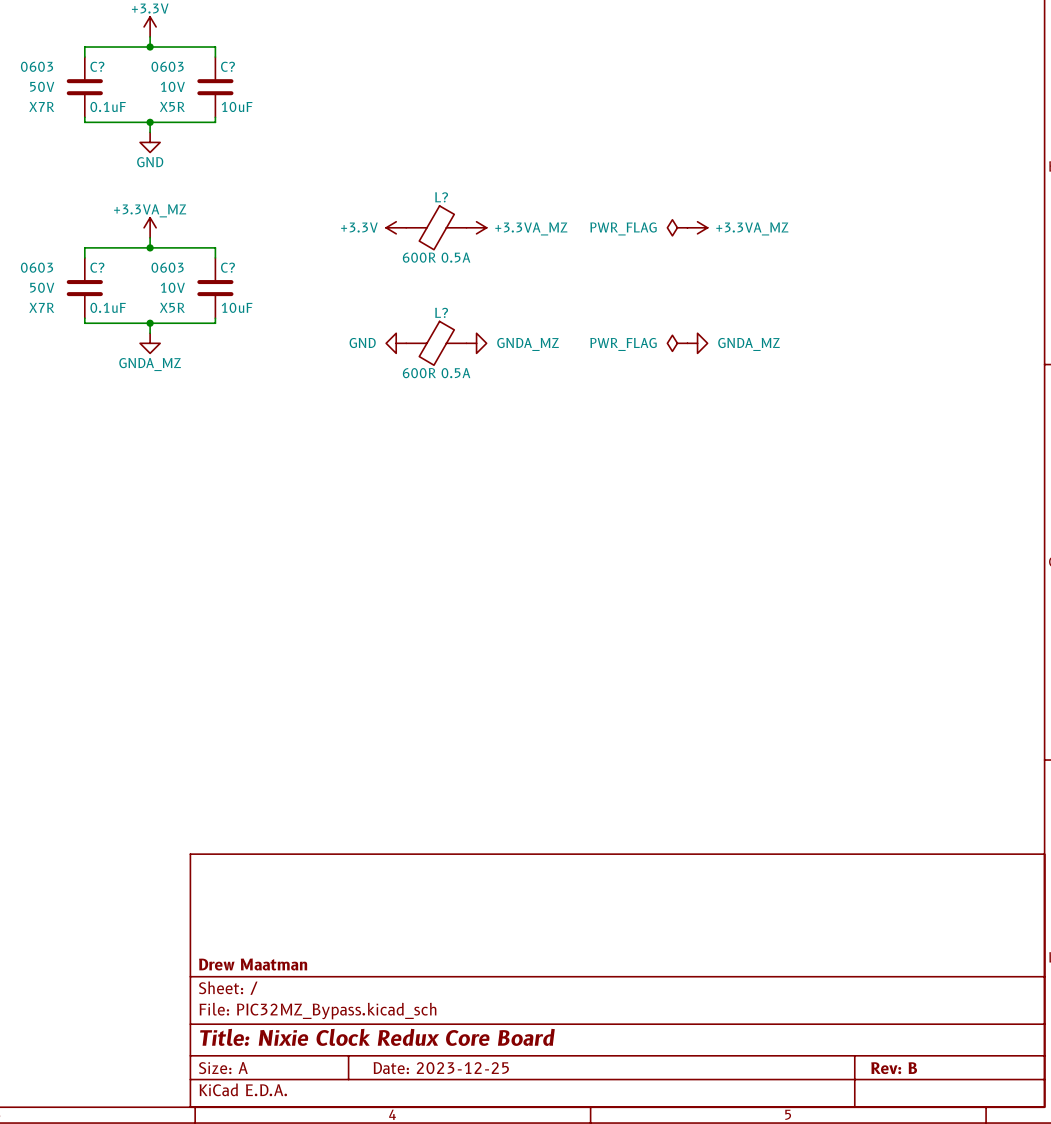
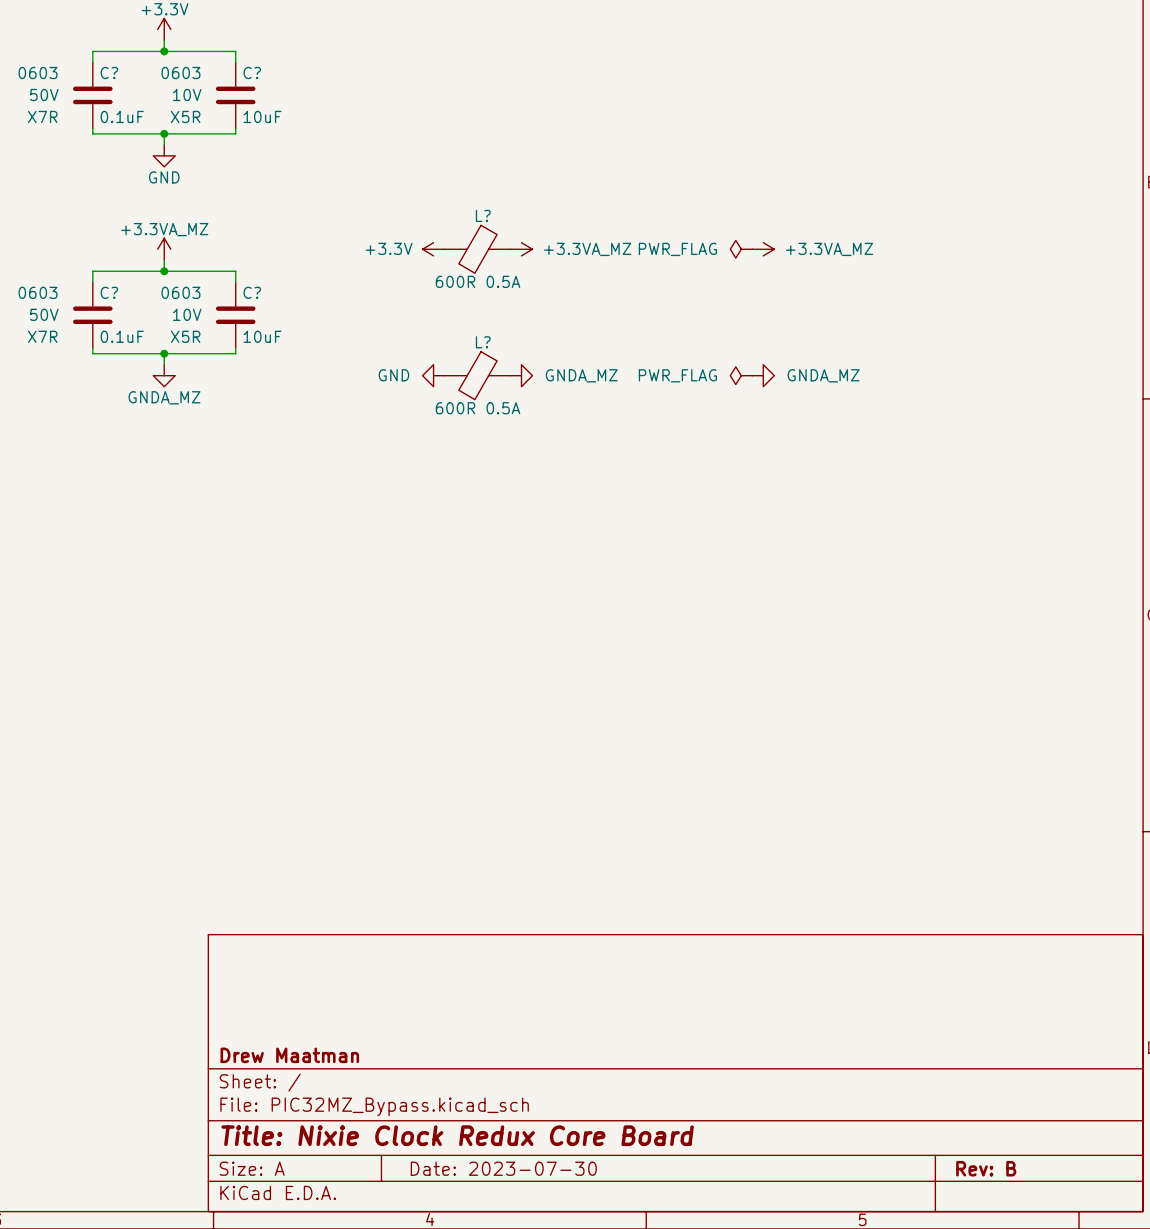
title block: Date: 2023-12-25 (441, 1068) -> Date: 2023-07-30 (503, 1168)

